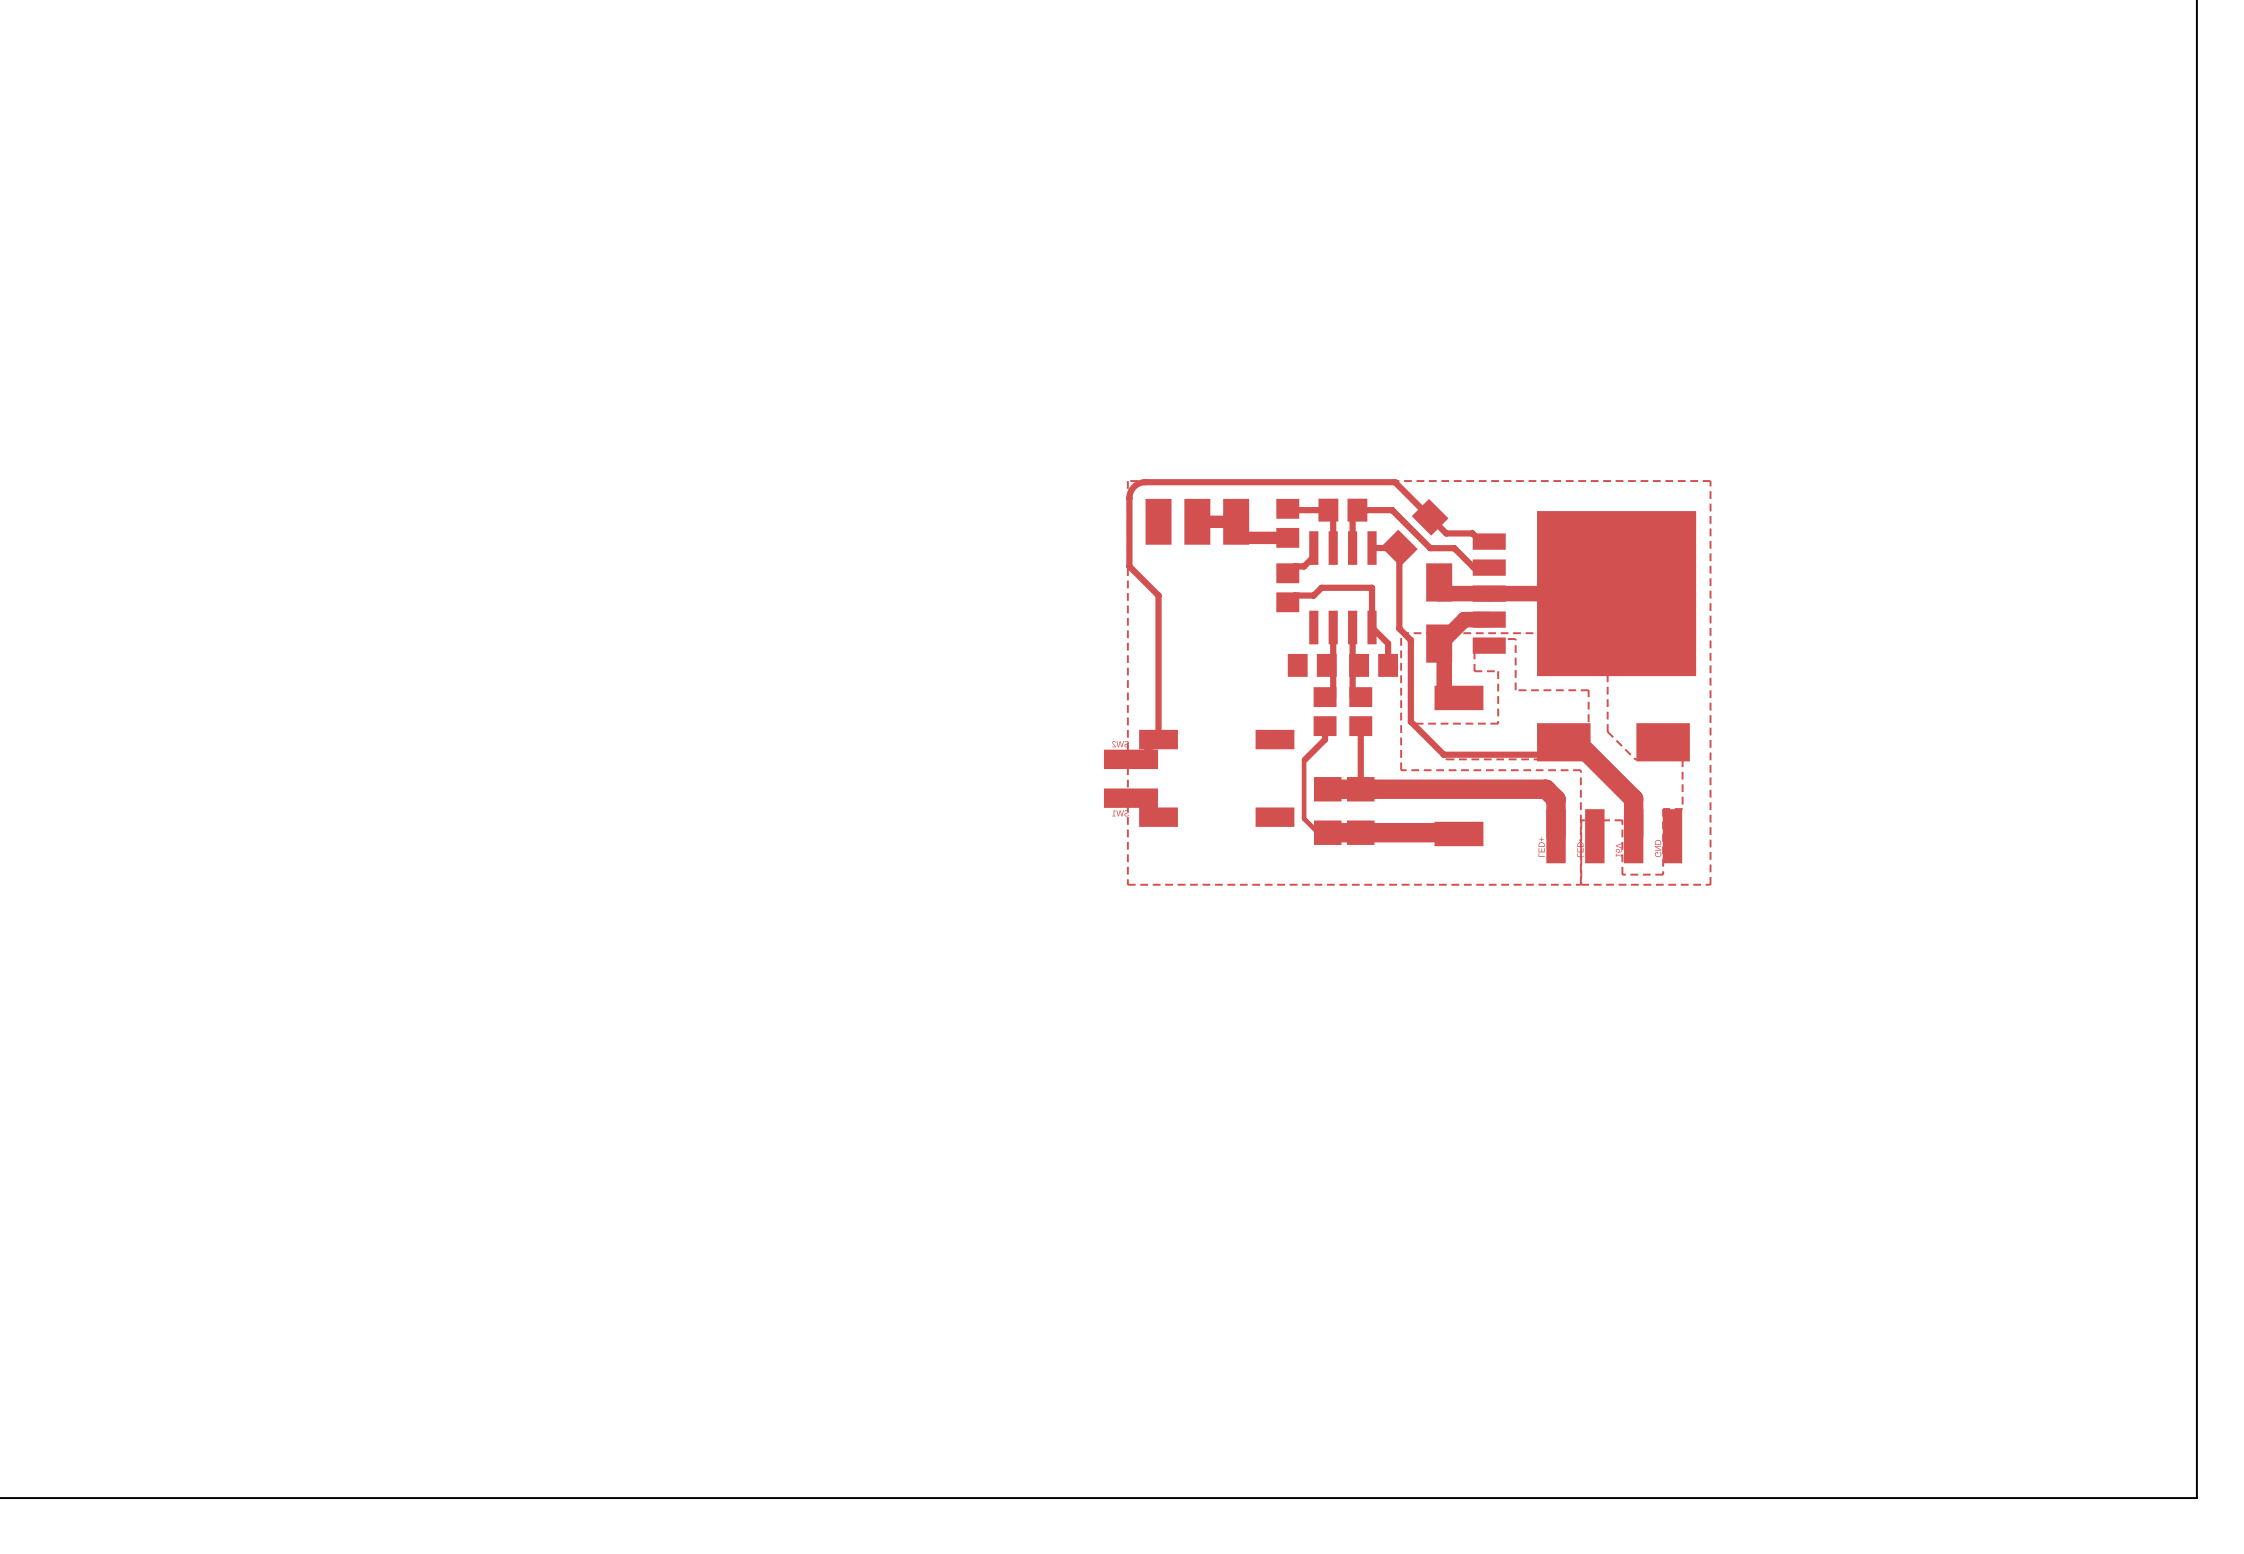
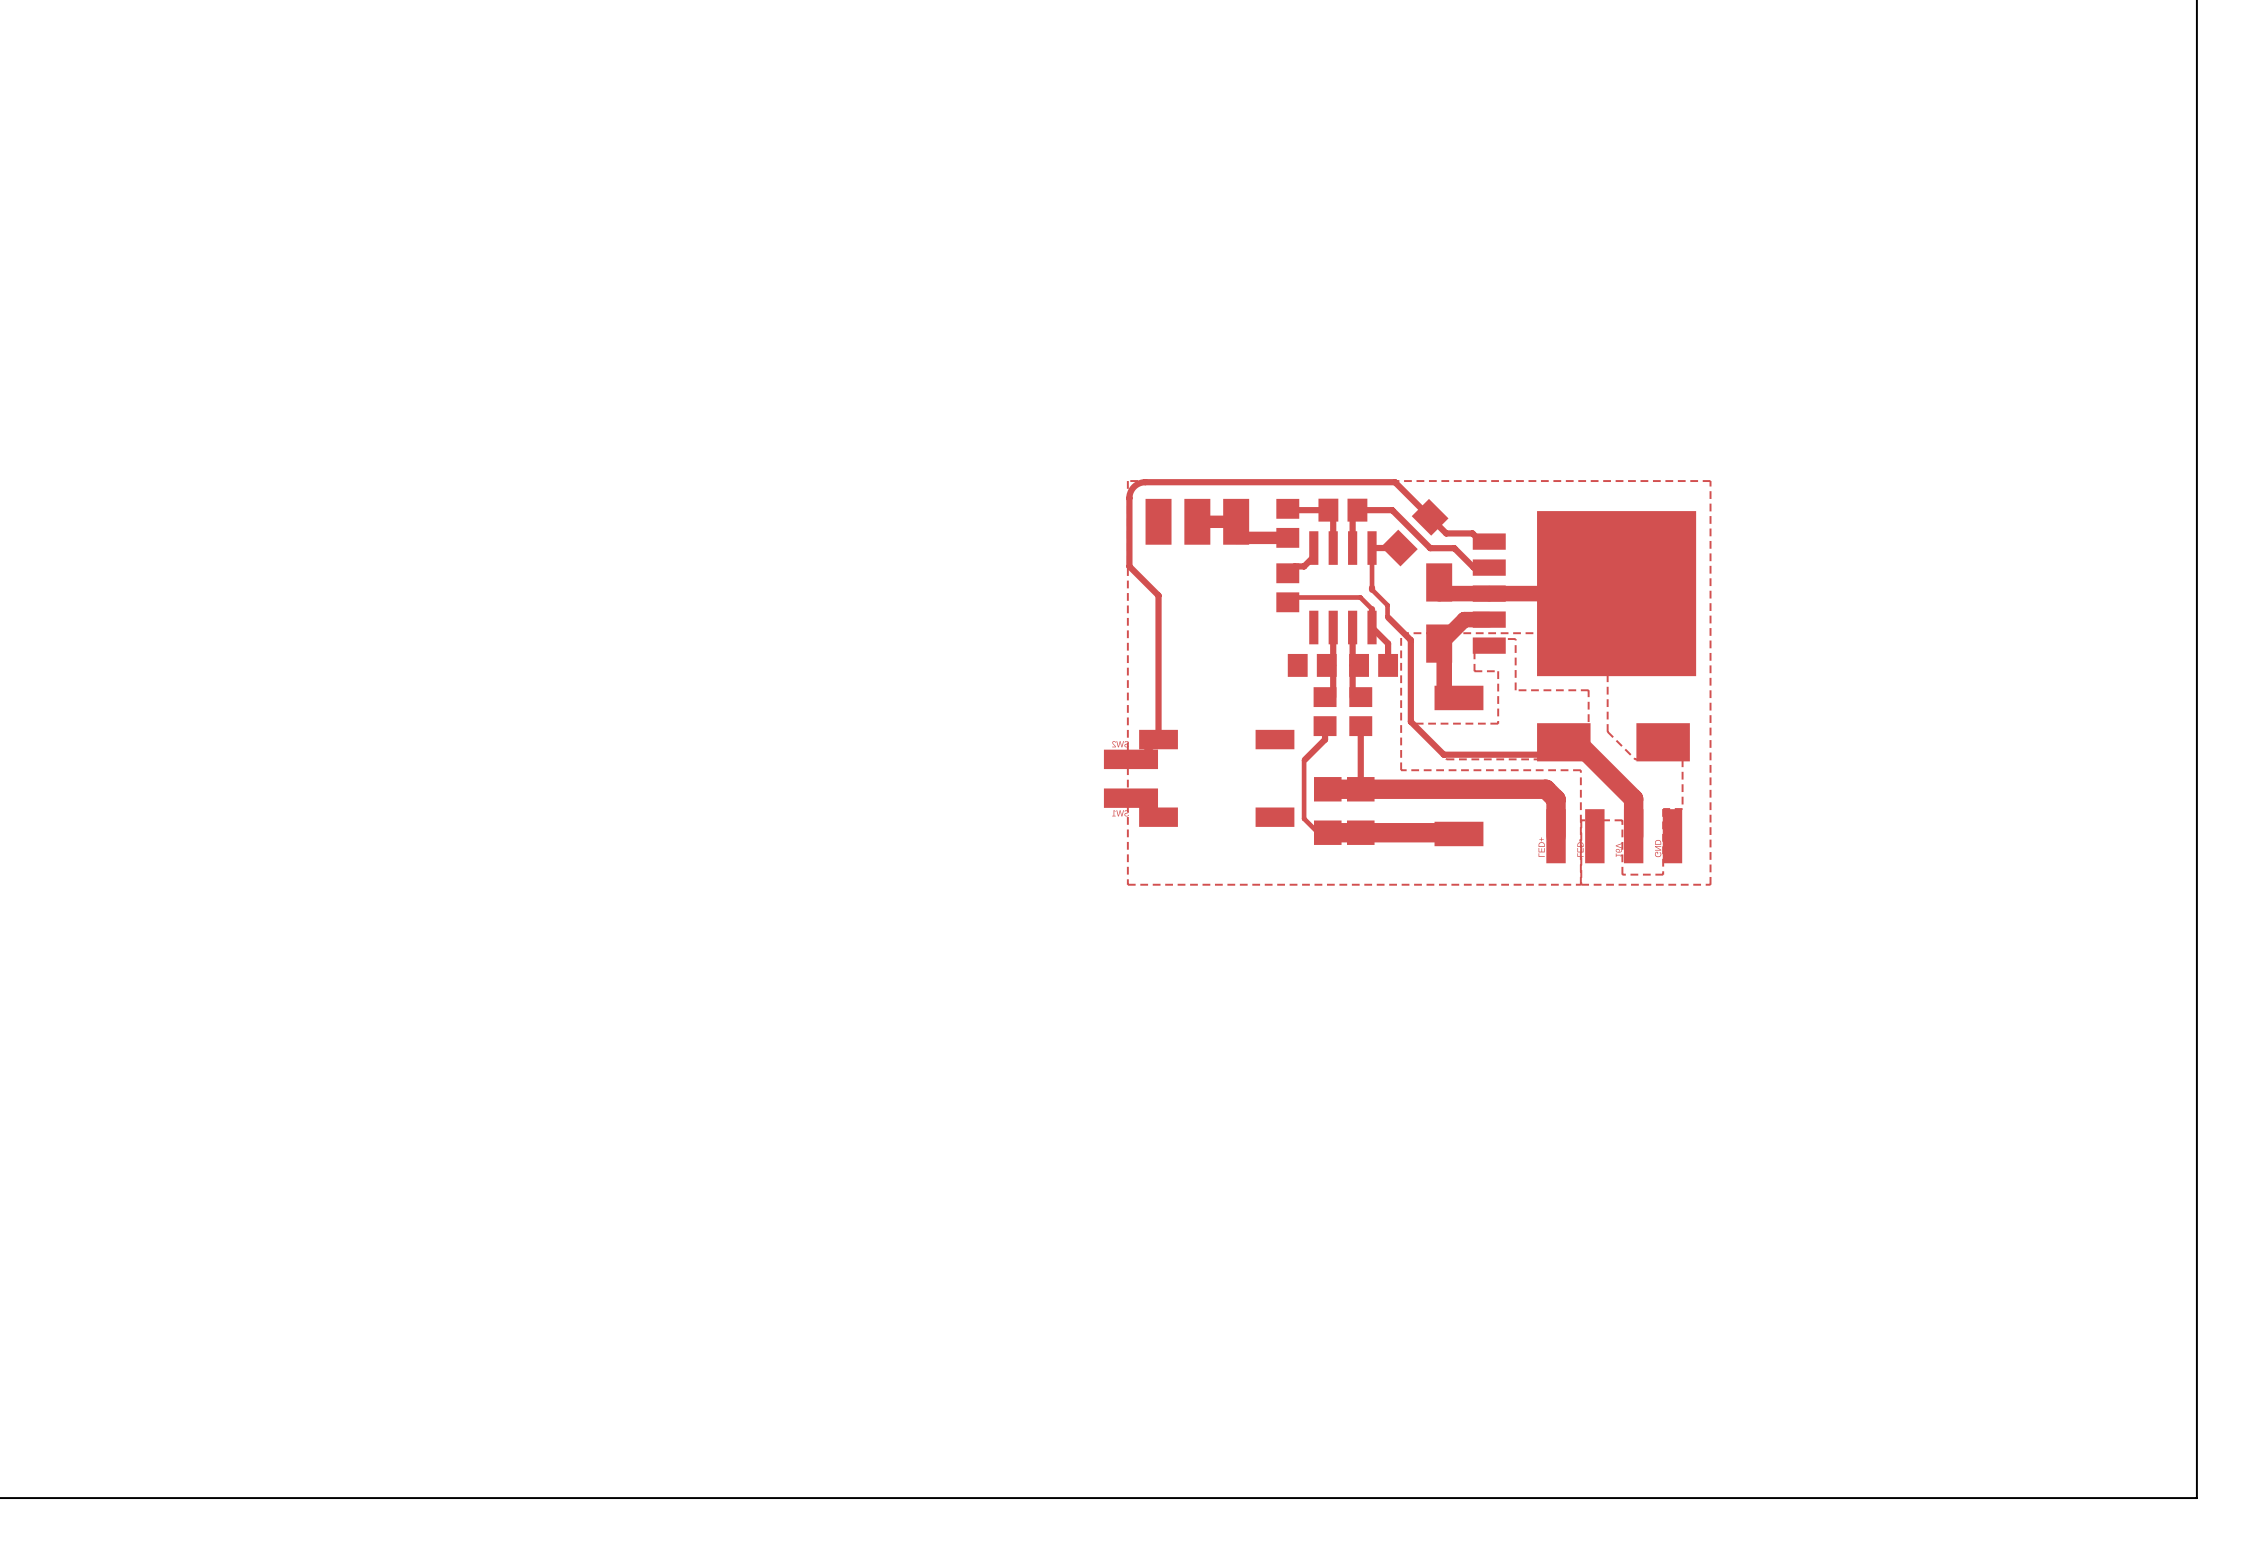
top track: (1399, 548) (1399, 628) -> none
top track: (1372, 587) (1321, 587) (1313, 595) (1294, 595) (1287, 602) -> (1372, 587) (1372, 548)
top track: (1372, 589) (1372, 609) -> (1372, 589) (1387, 605) (1387, 616) (1399, 628)
top track: none -> (1287, 597) (1360, 597) (1372, 609)

